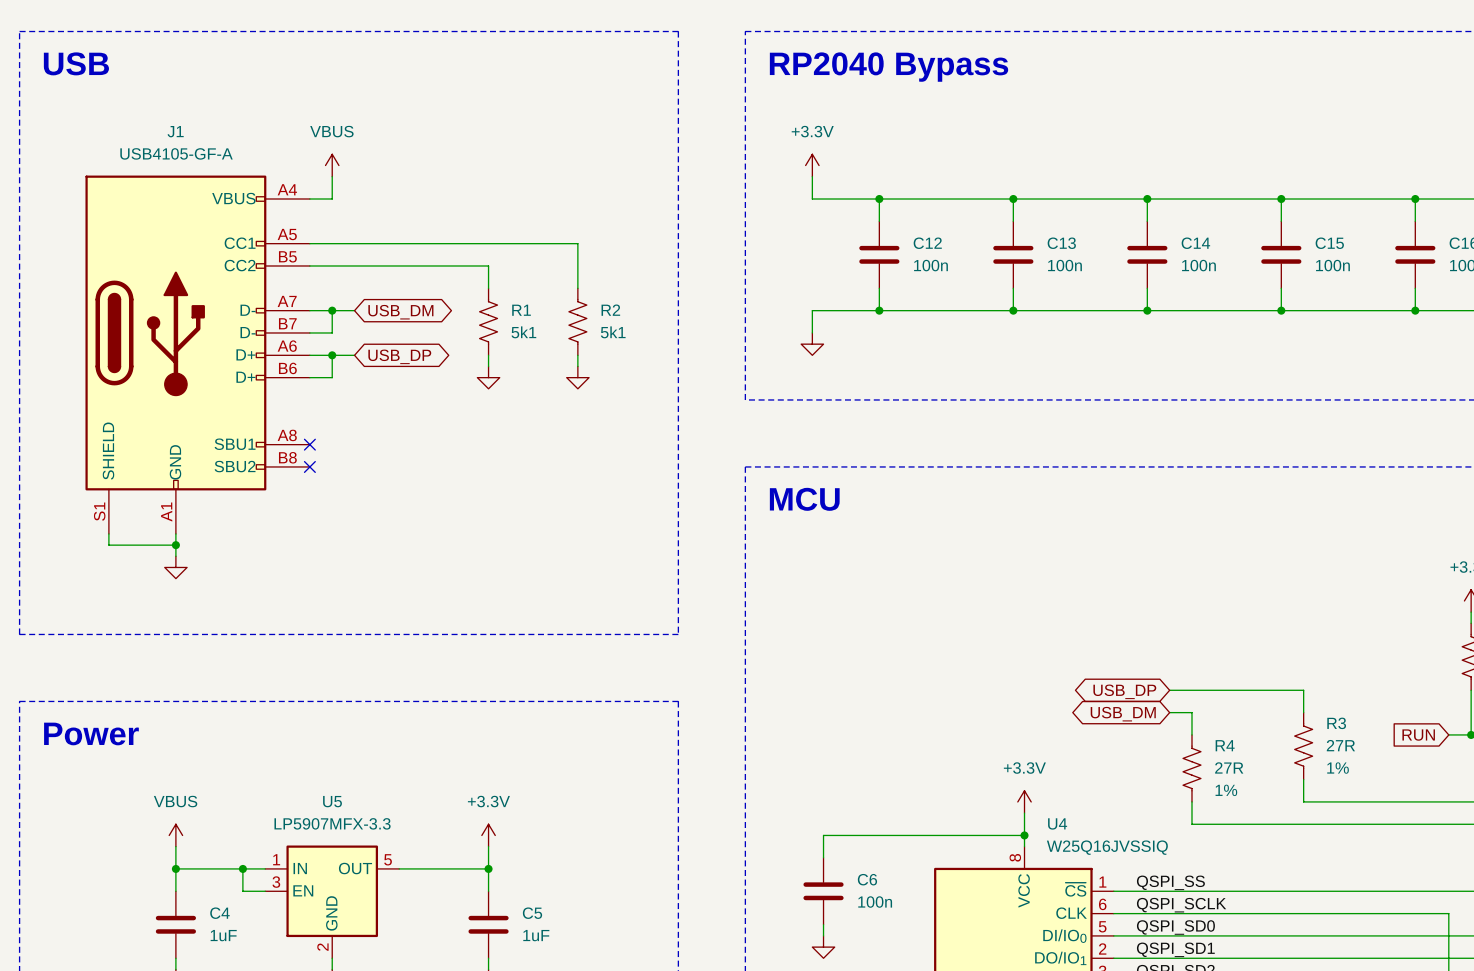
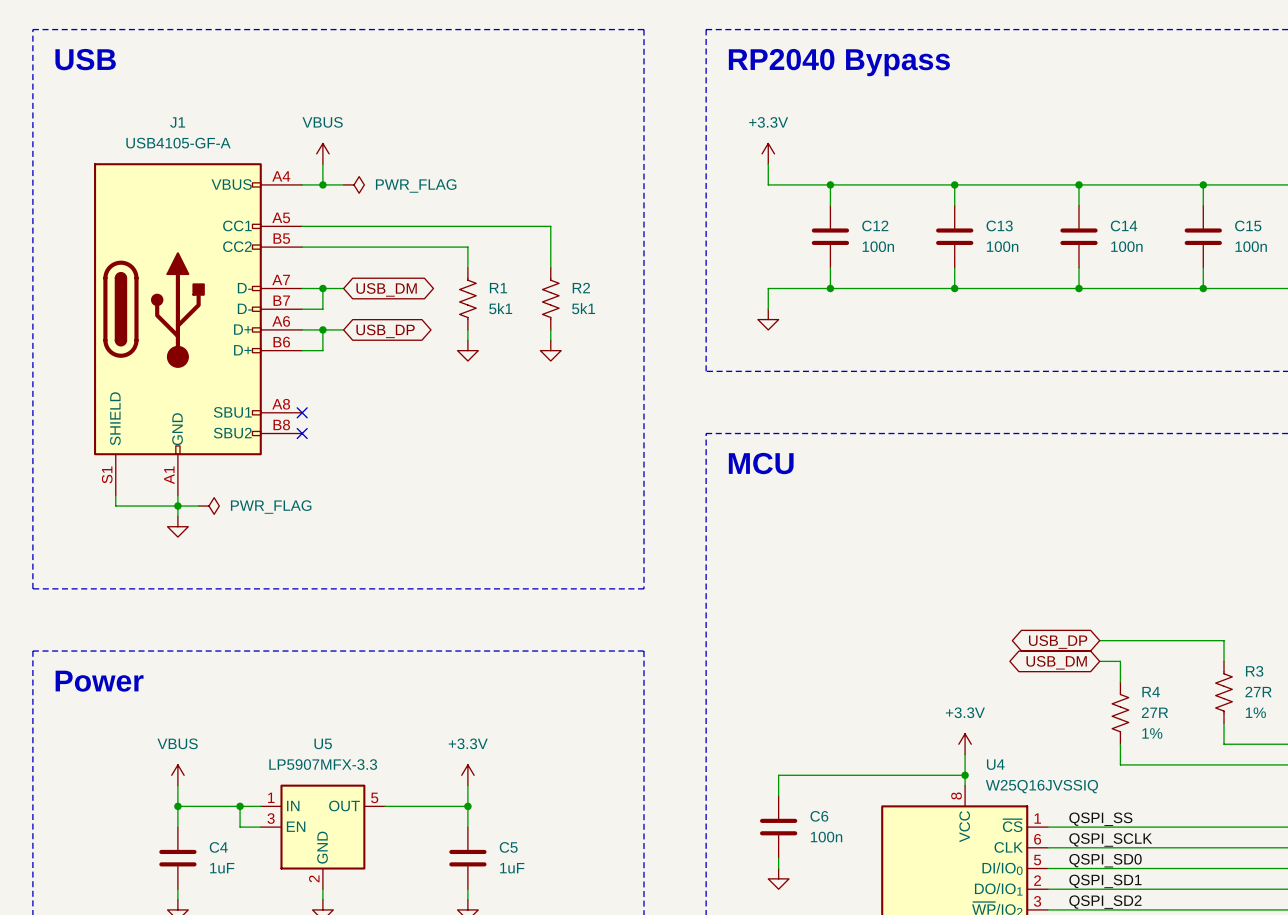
wire: none -> (322, 184) (343, 184)
junction: none -> (322, 184)
power symbol: none -> PWR_FLAG (353, 184)
wire: none -> (177, 506) (198, 506)
power symbol: none -> PWR_FLAG (208, 506)

